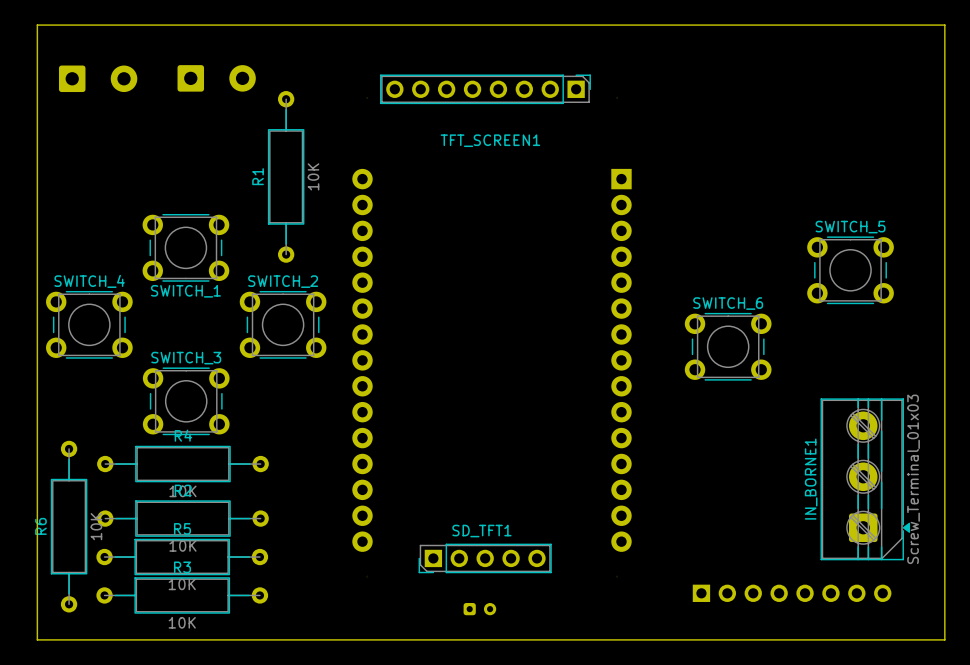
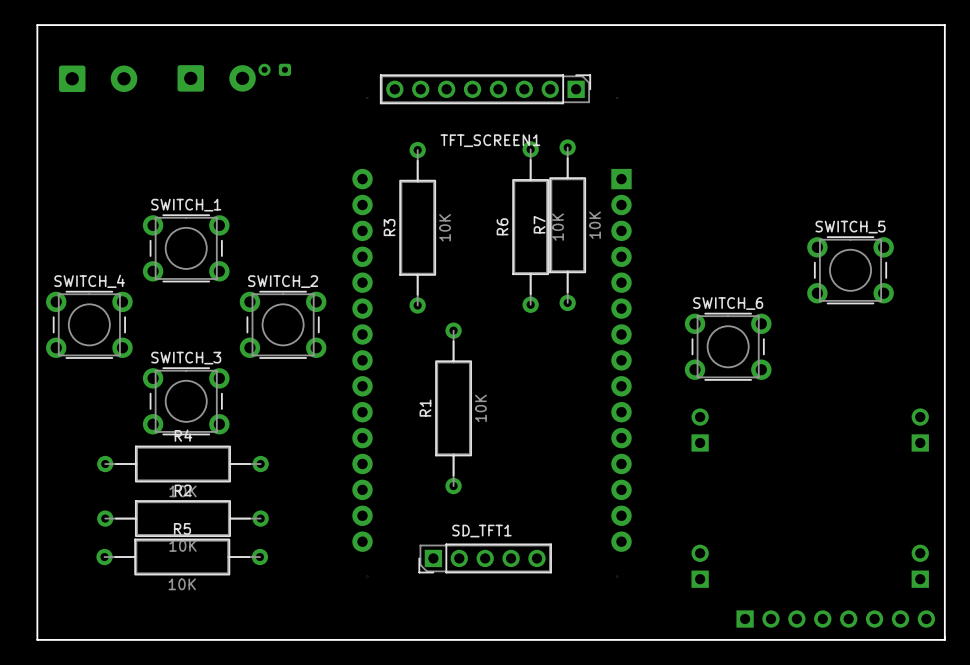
part: none -> (274, 69)
R1 position: (286, 176) -> (453, 408)
R7: none -> 10K (567, 225)
SWITCH_1 rotation: 0° (185, 247) -> 180° (186, 248)
part: none -> (700, 430)
part: none -> (920, 430)
IN_BORNE1: Screw_Terminal_01x03 (865, 479) -> none
R6 position: (69, 526) -> (530, 227)
part: none -> (700, 566)
part: none -> (920, 566)
R3 name position: R3 (182, 567) -> R3 (389, 227)
part position: (792, 593) -> (835, 619)
R3 rotation: 0° (182, 595) -> 90° clockwise (417, 227)
R3 position: (182, 595) -> (417, 227)
part: (479, 609) -> none
R3 value position: 10K (182, 622) -> 10K (445, 227)

